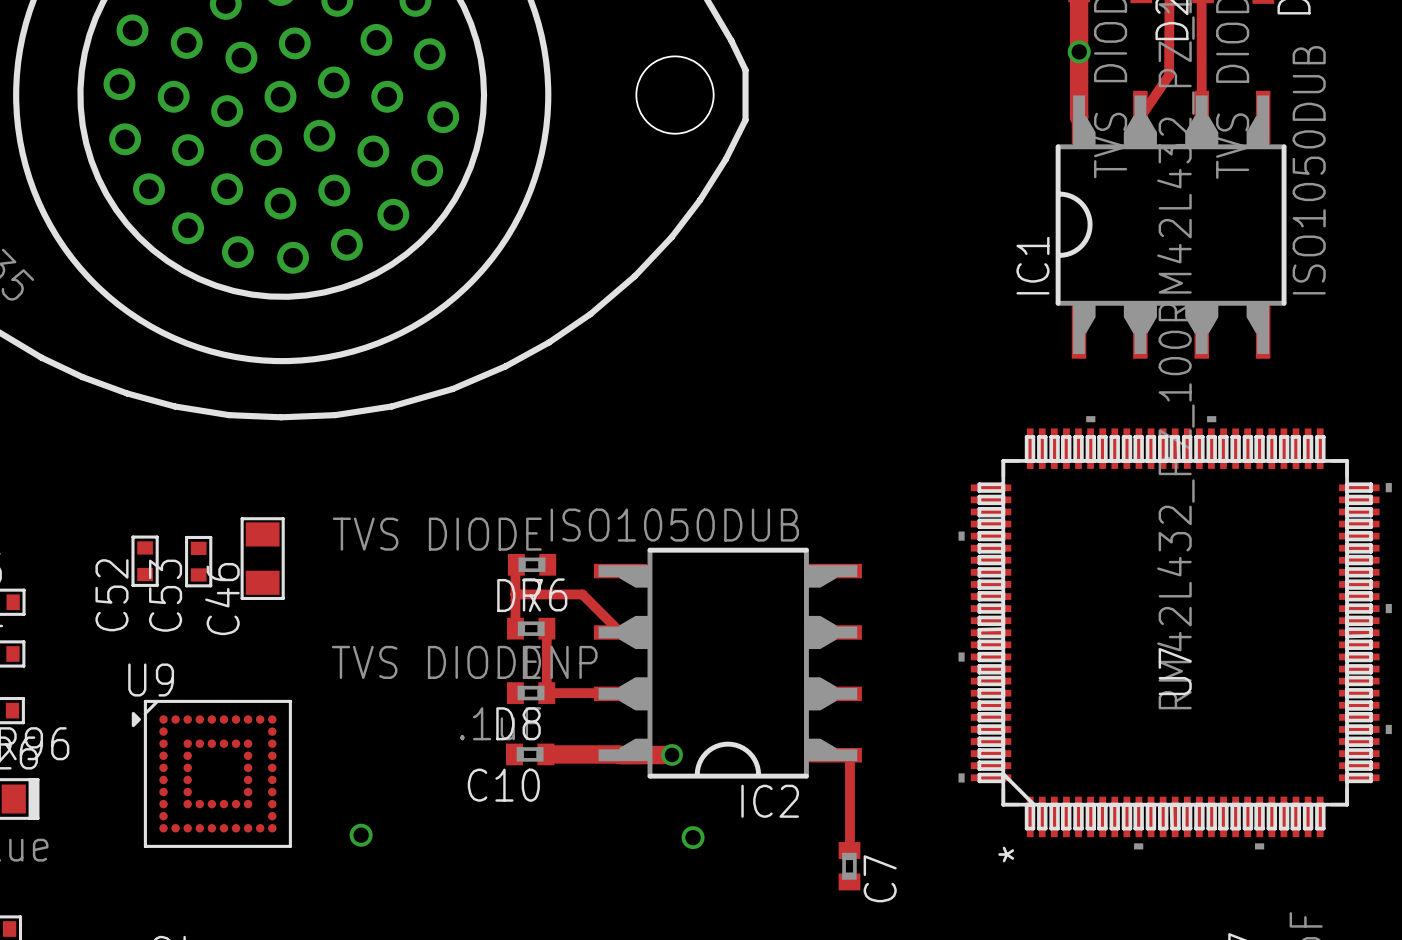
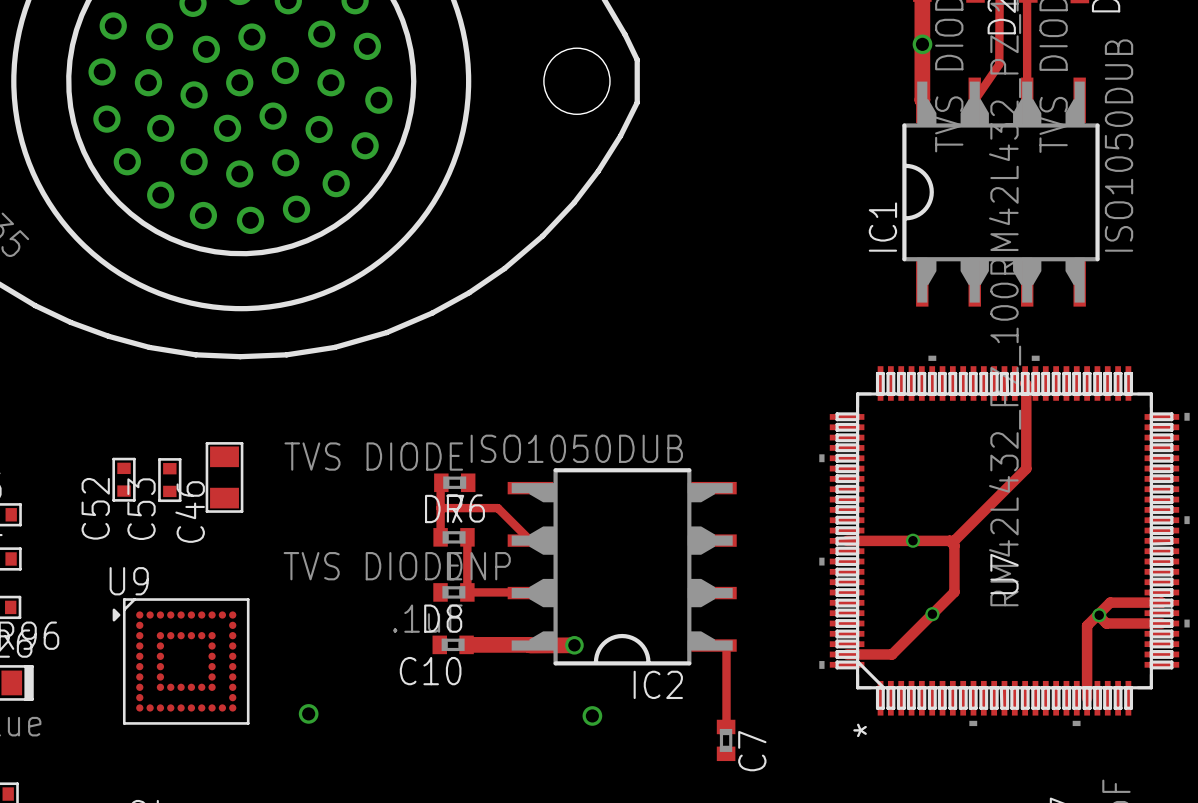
track: none -> (1025, 383) (1026, 468) (954, 540) (847, 540)
via: none -> (912, 540)
track: none -> (949, 540) (954, 545) (954, 592) (892, 654) (847, 654)
track: none -> (1161, 602) (1110, 602) (1087, 625) (1087, 698)
via: none -> (932, 614)
track: none -> (1097, 614) (1106, 623) (1161, 623)
via: none -> (1099, 615)

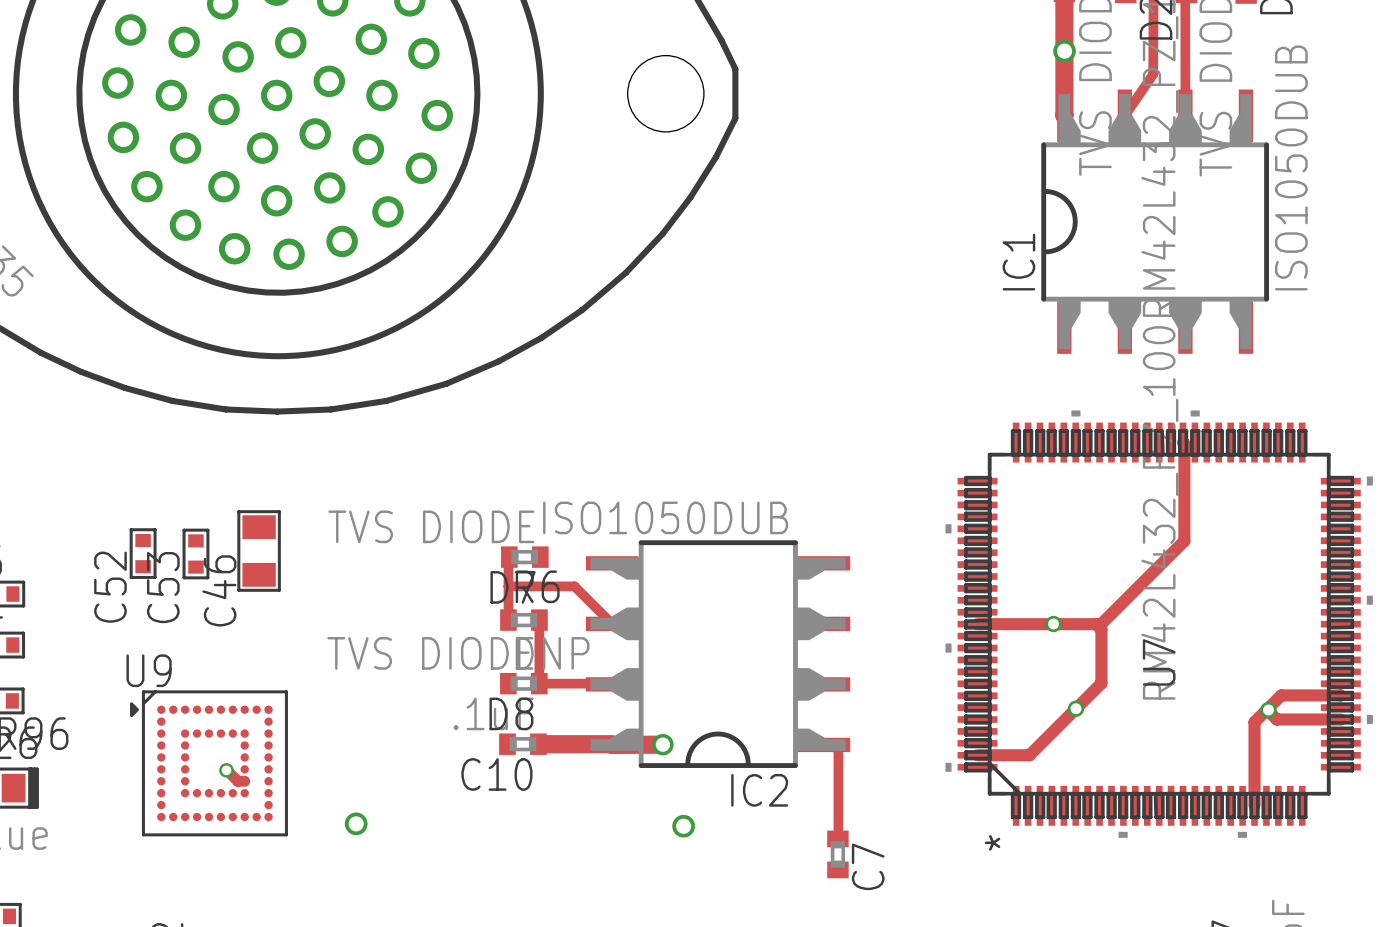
track: none -> (226, 769) (237, 781) (244, 781)
via: none -> (226, 770)

